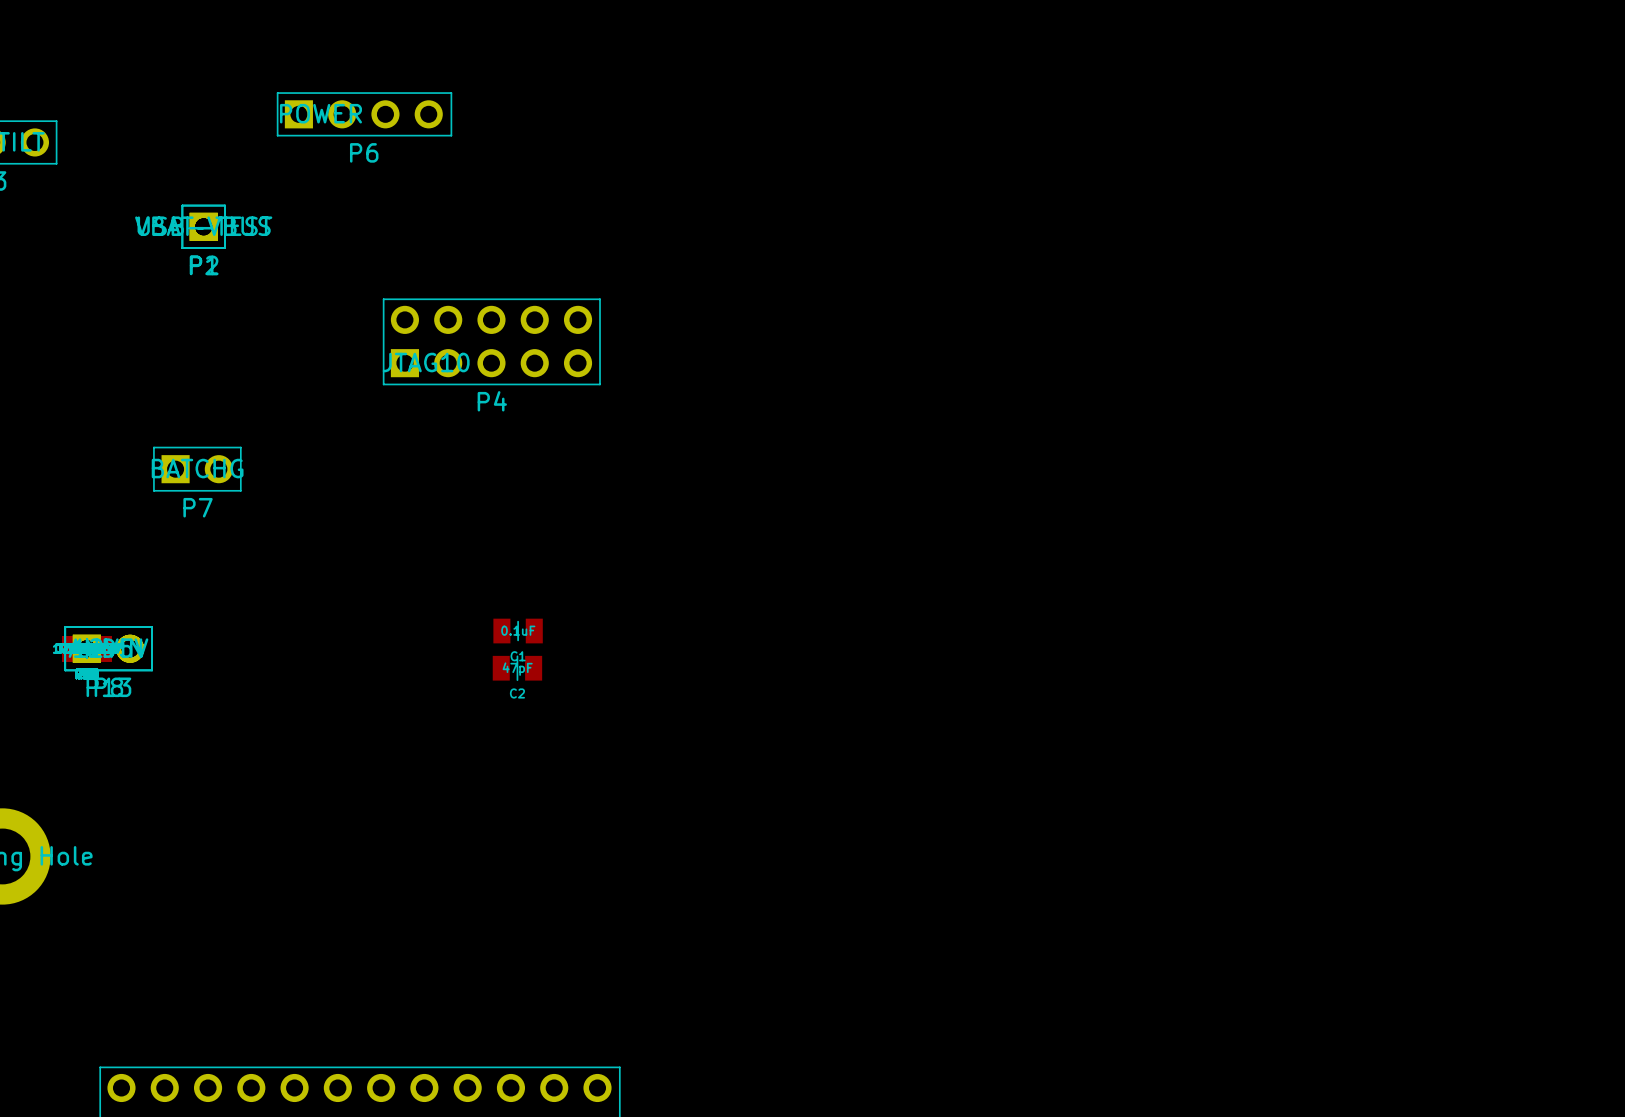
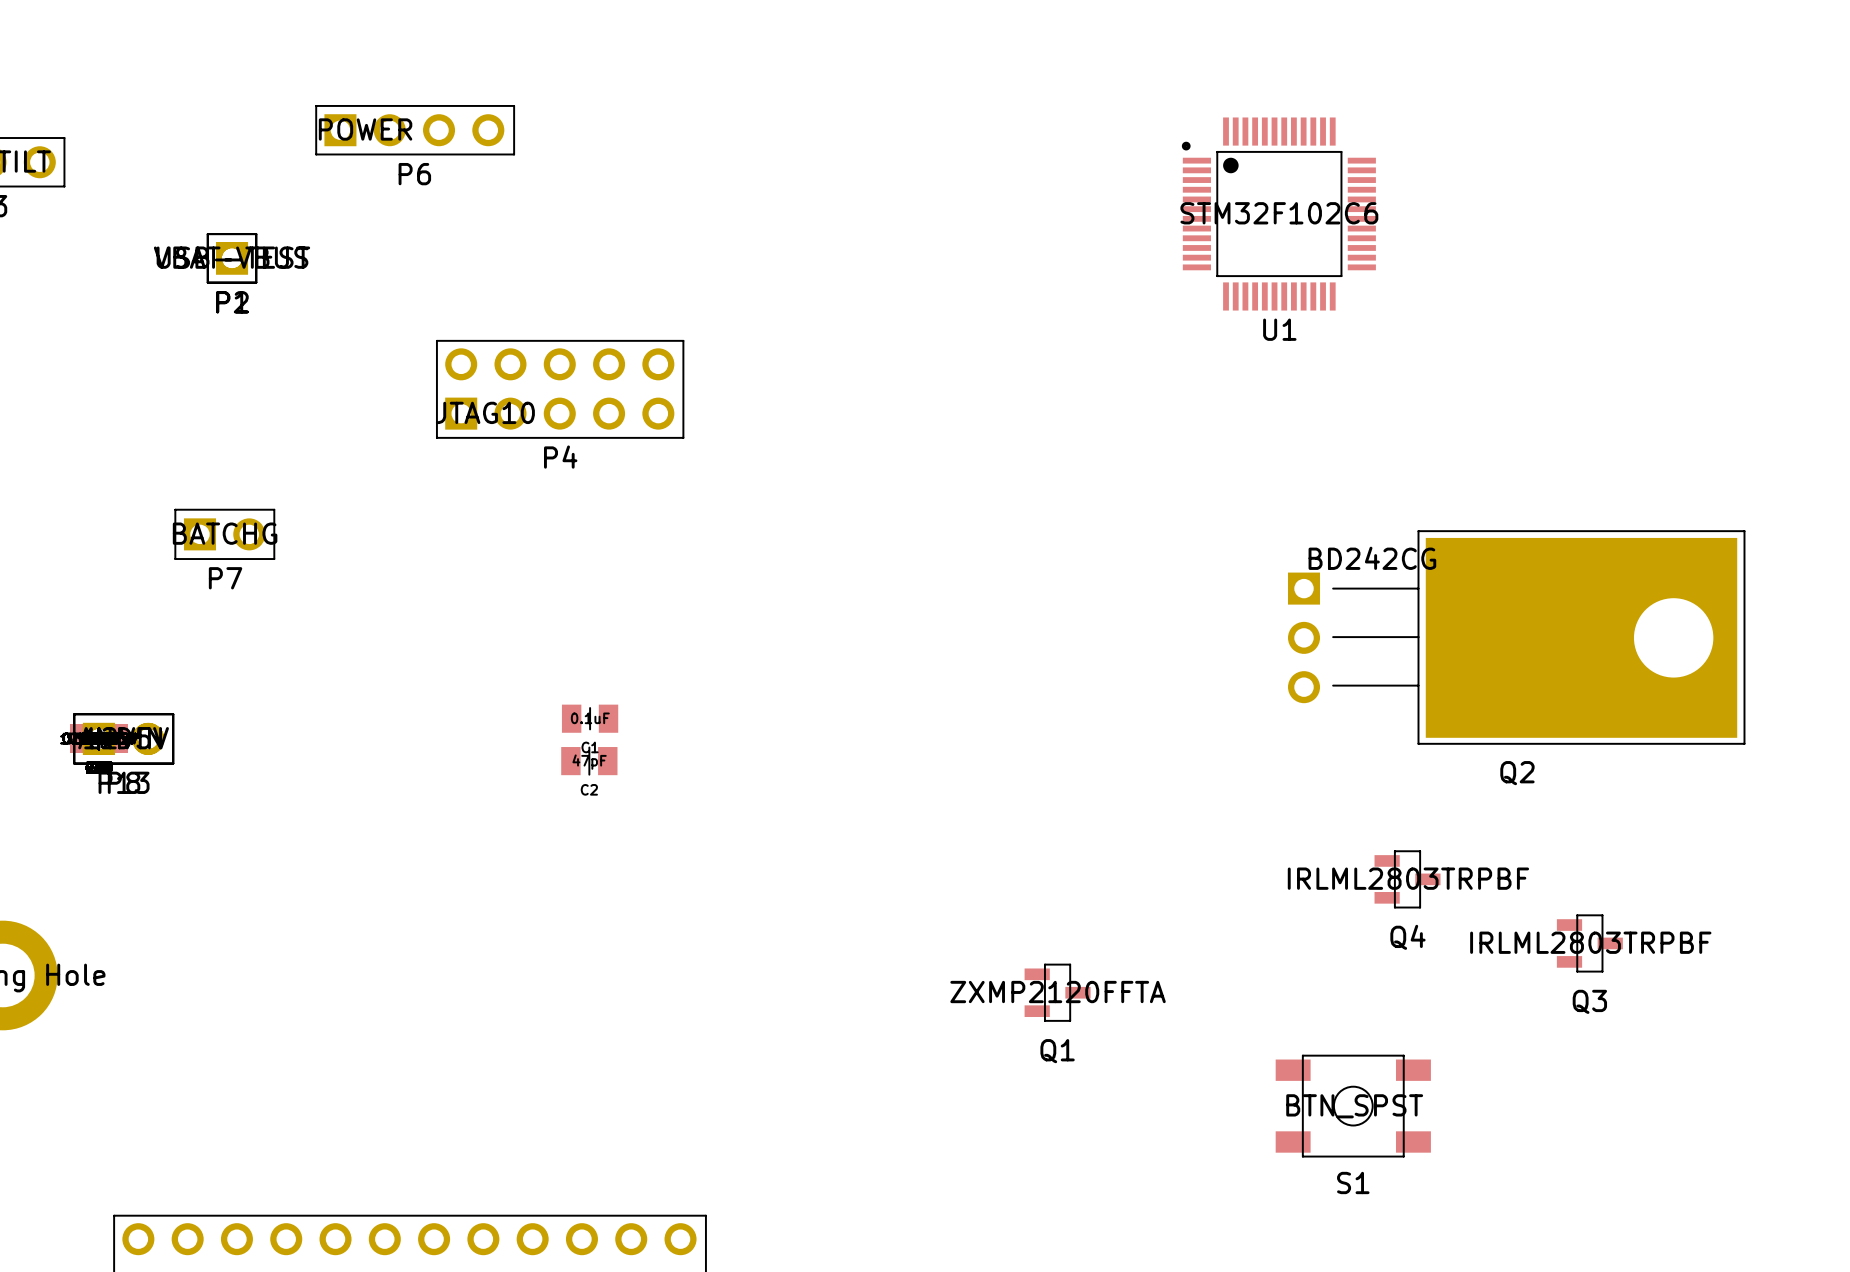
U1: none -> STM32F102C6 (1278, 214)
Q2: none -> BD242CG (1516, 637)
Q4: none -> IRLML2803TRPBF (1407, 879)
Q3: none -> IRLML2803TRPBF (1589, 943)
Q1: none -> ZXMP2120FFTA (1057, 992)
S1: none -> BTN_SPST (1353, 1106)

